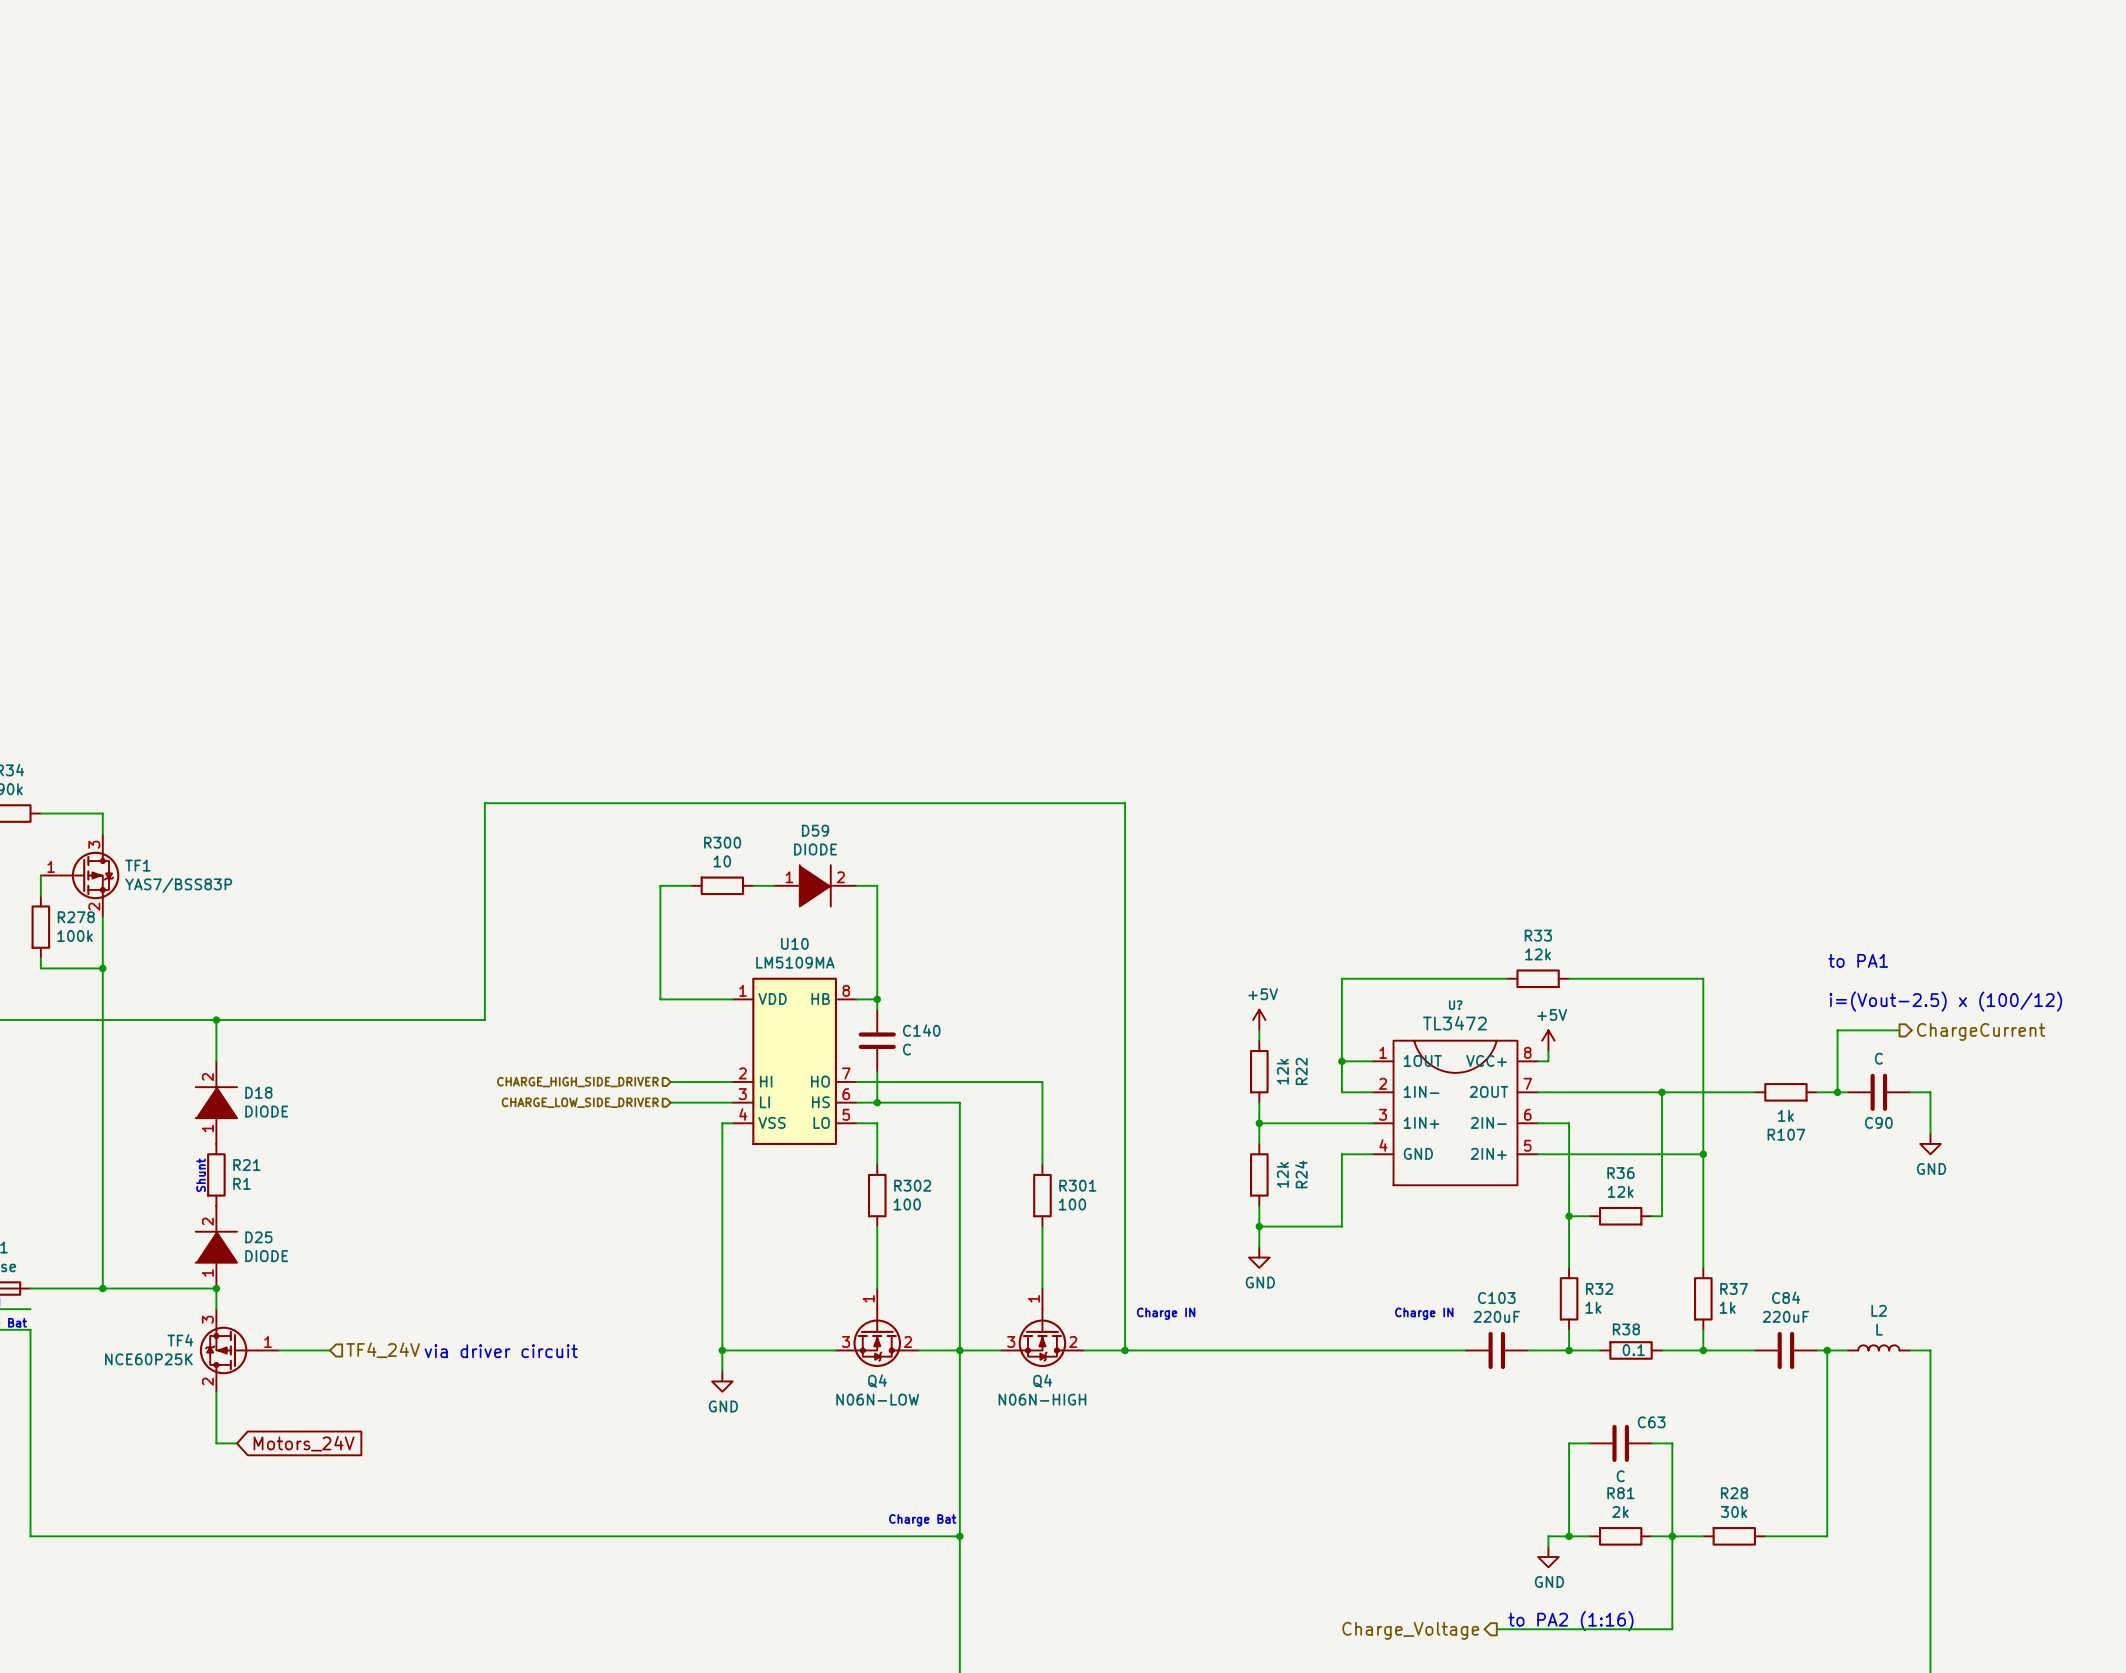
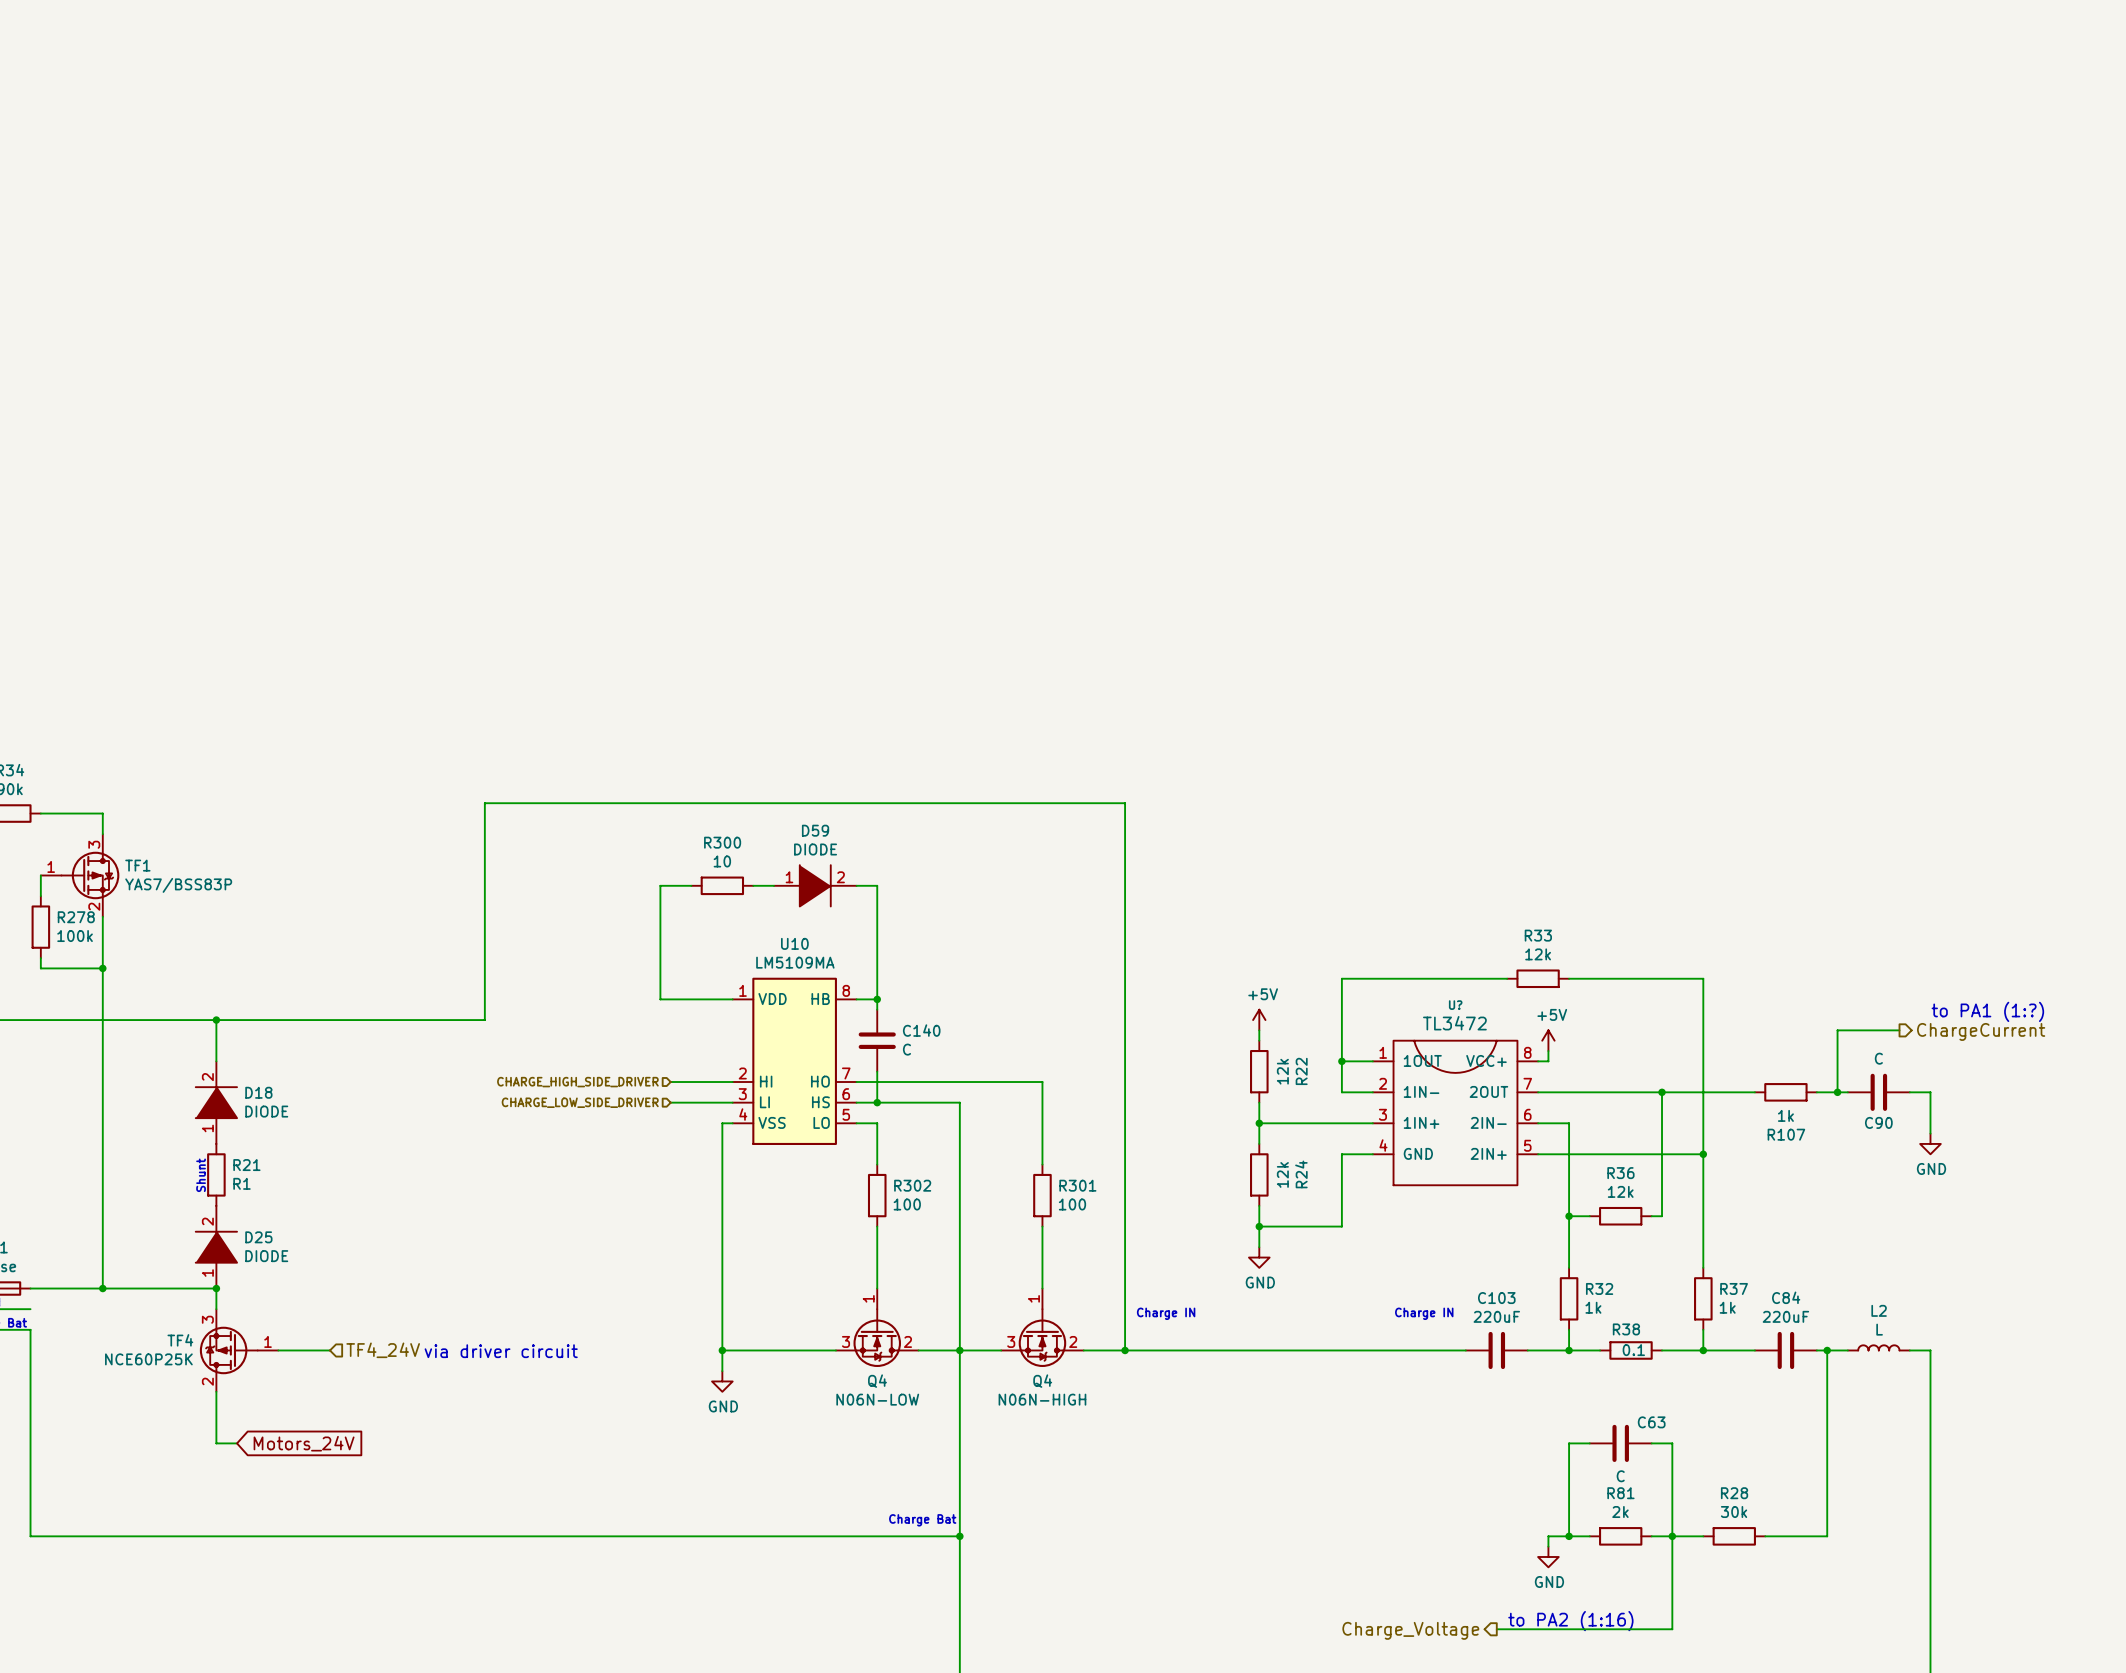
text: to PA1 (1858, 960) -> none
text: i=(Vout-2.5) x (100/12) (1945, 1001) -> none
text: none -> to PA1 (1:?) (1987, 1011)

